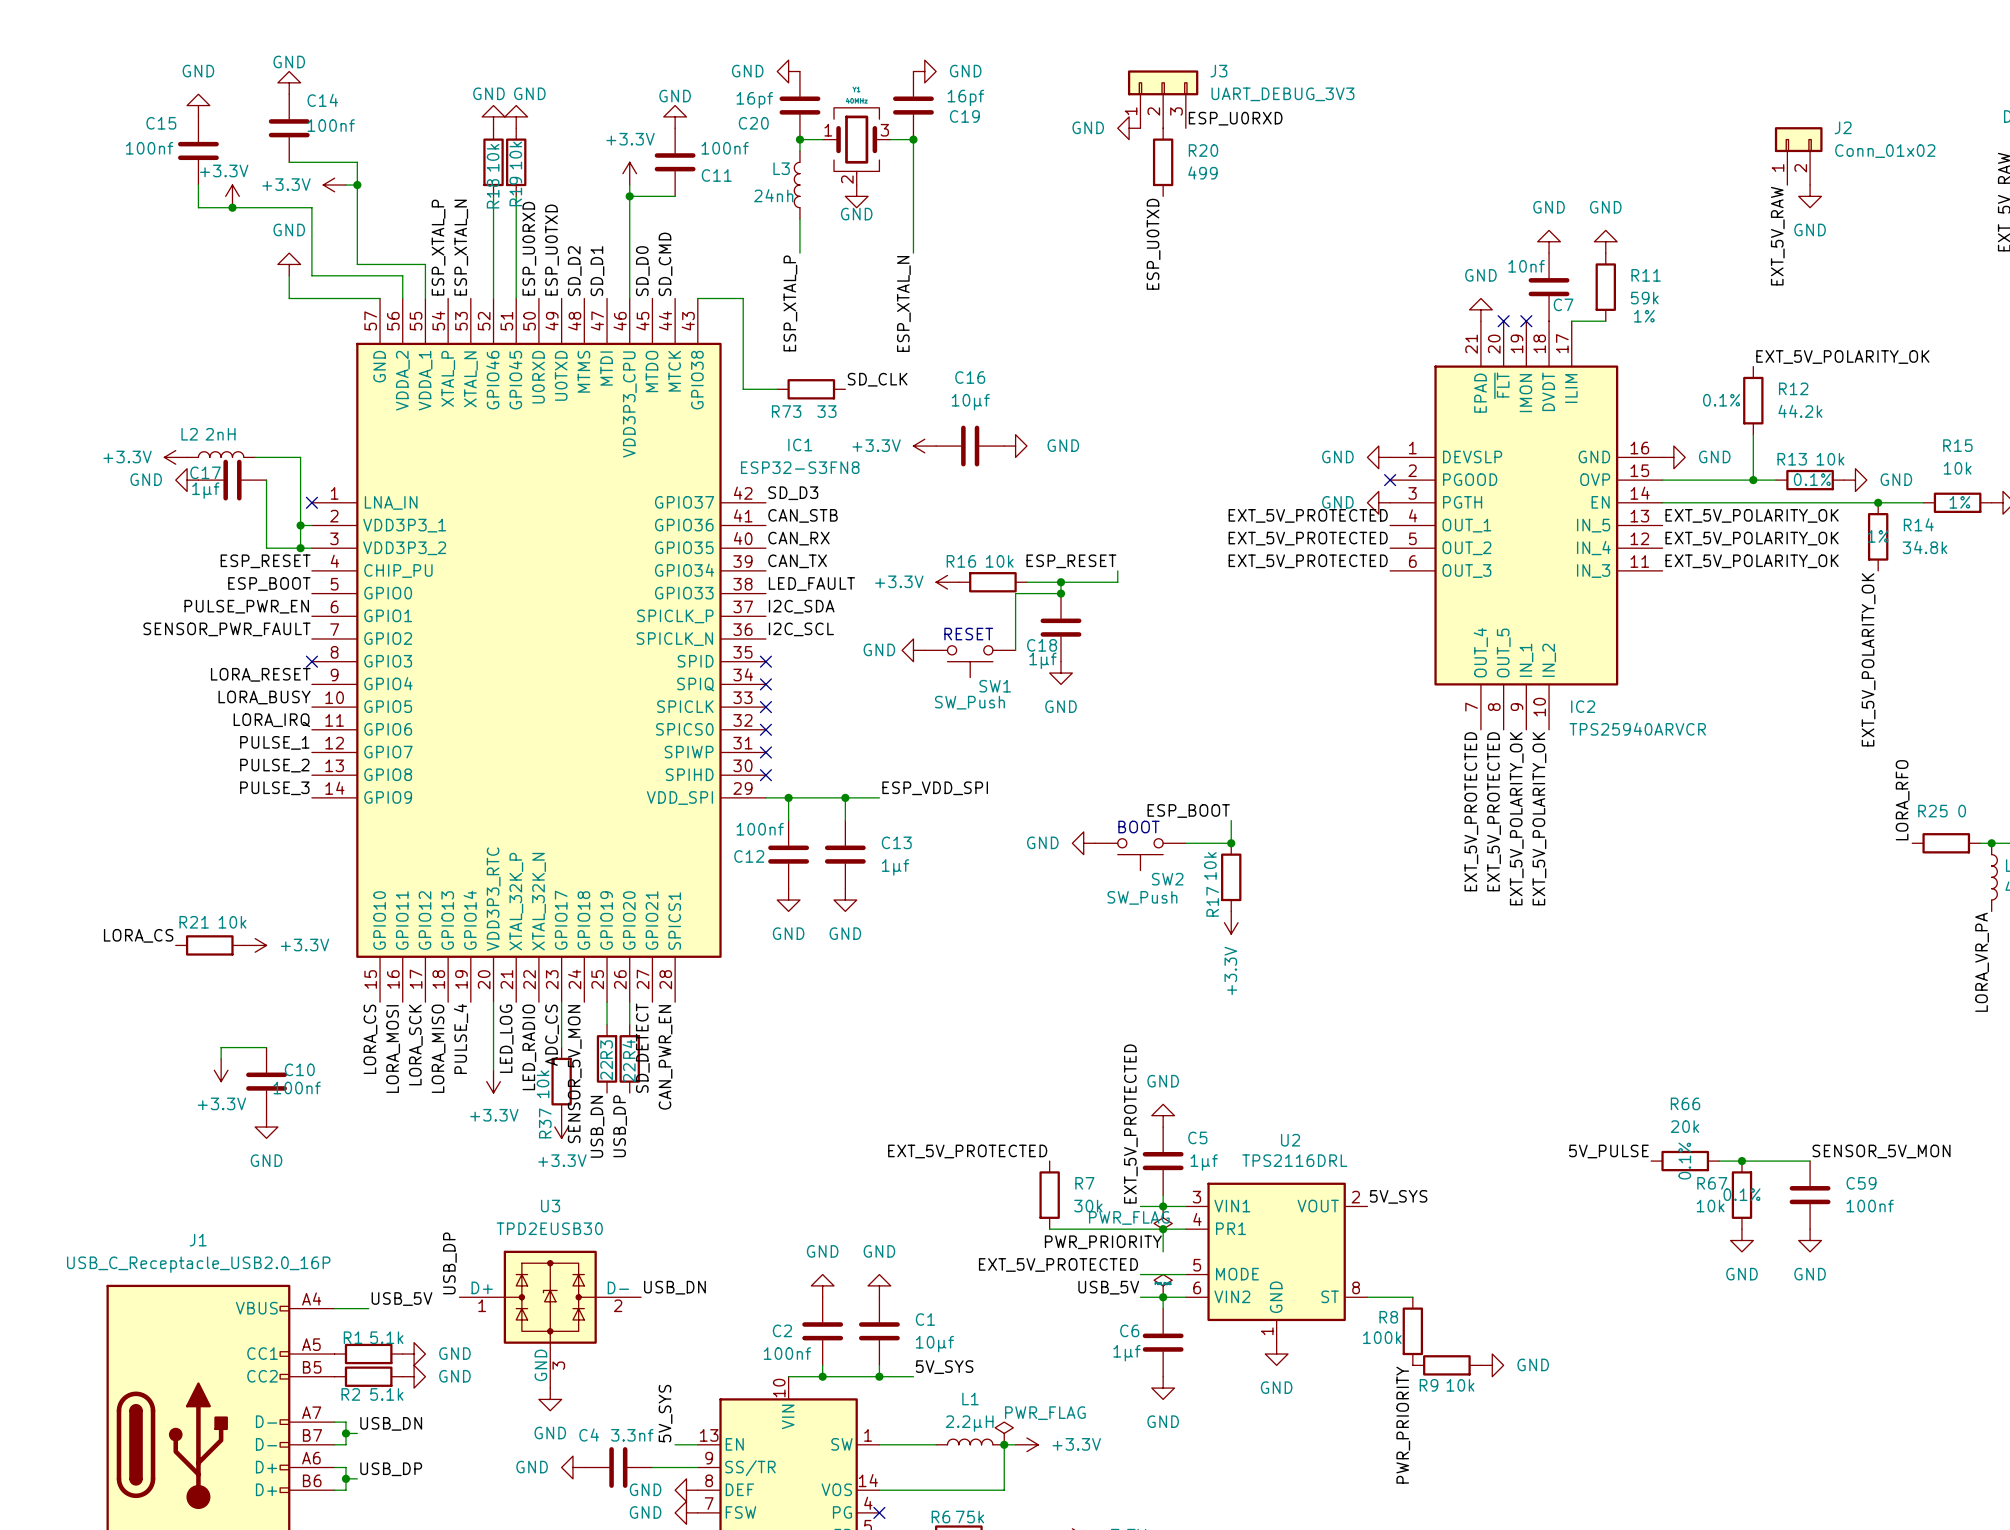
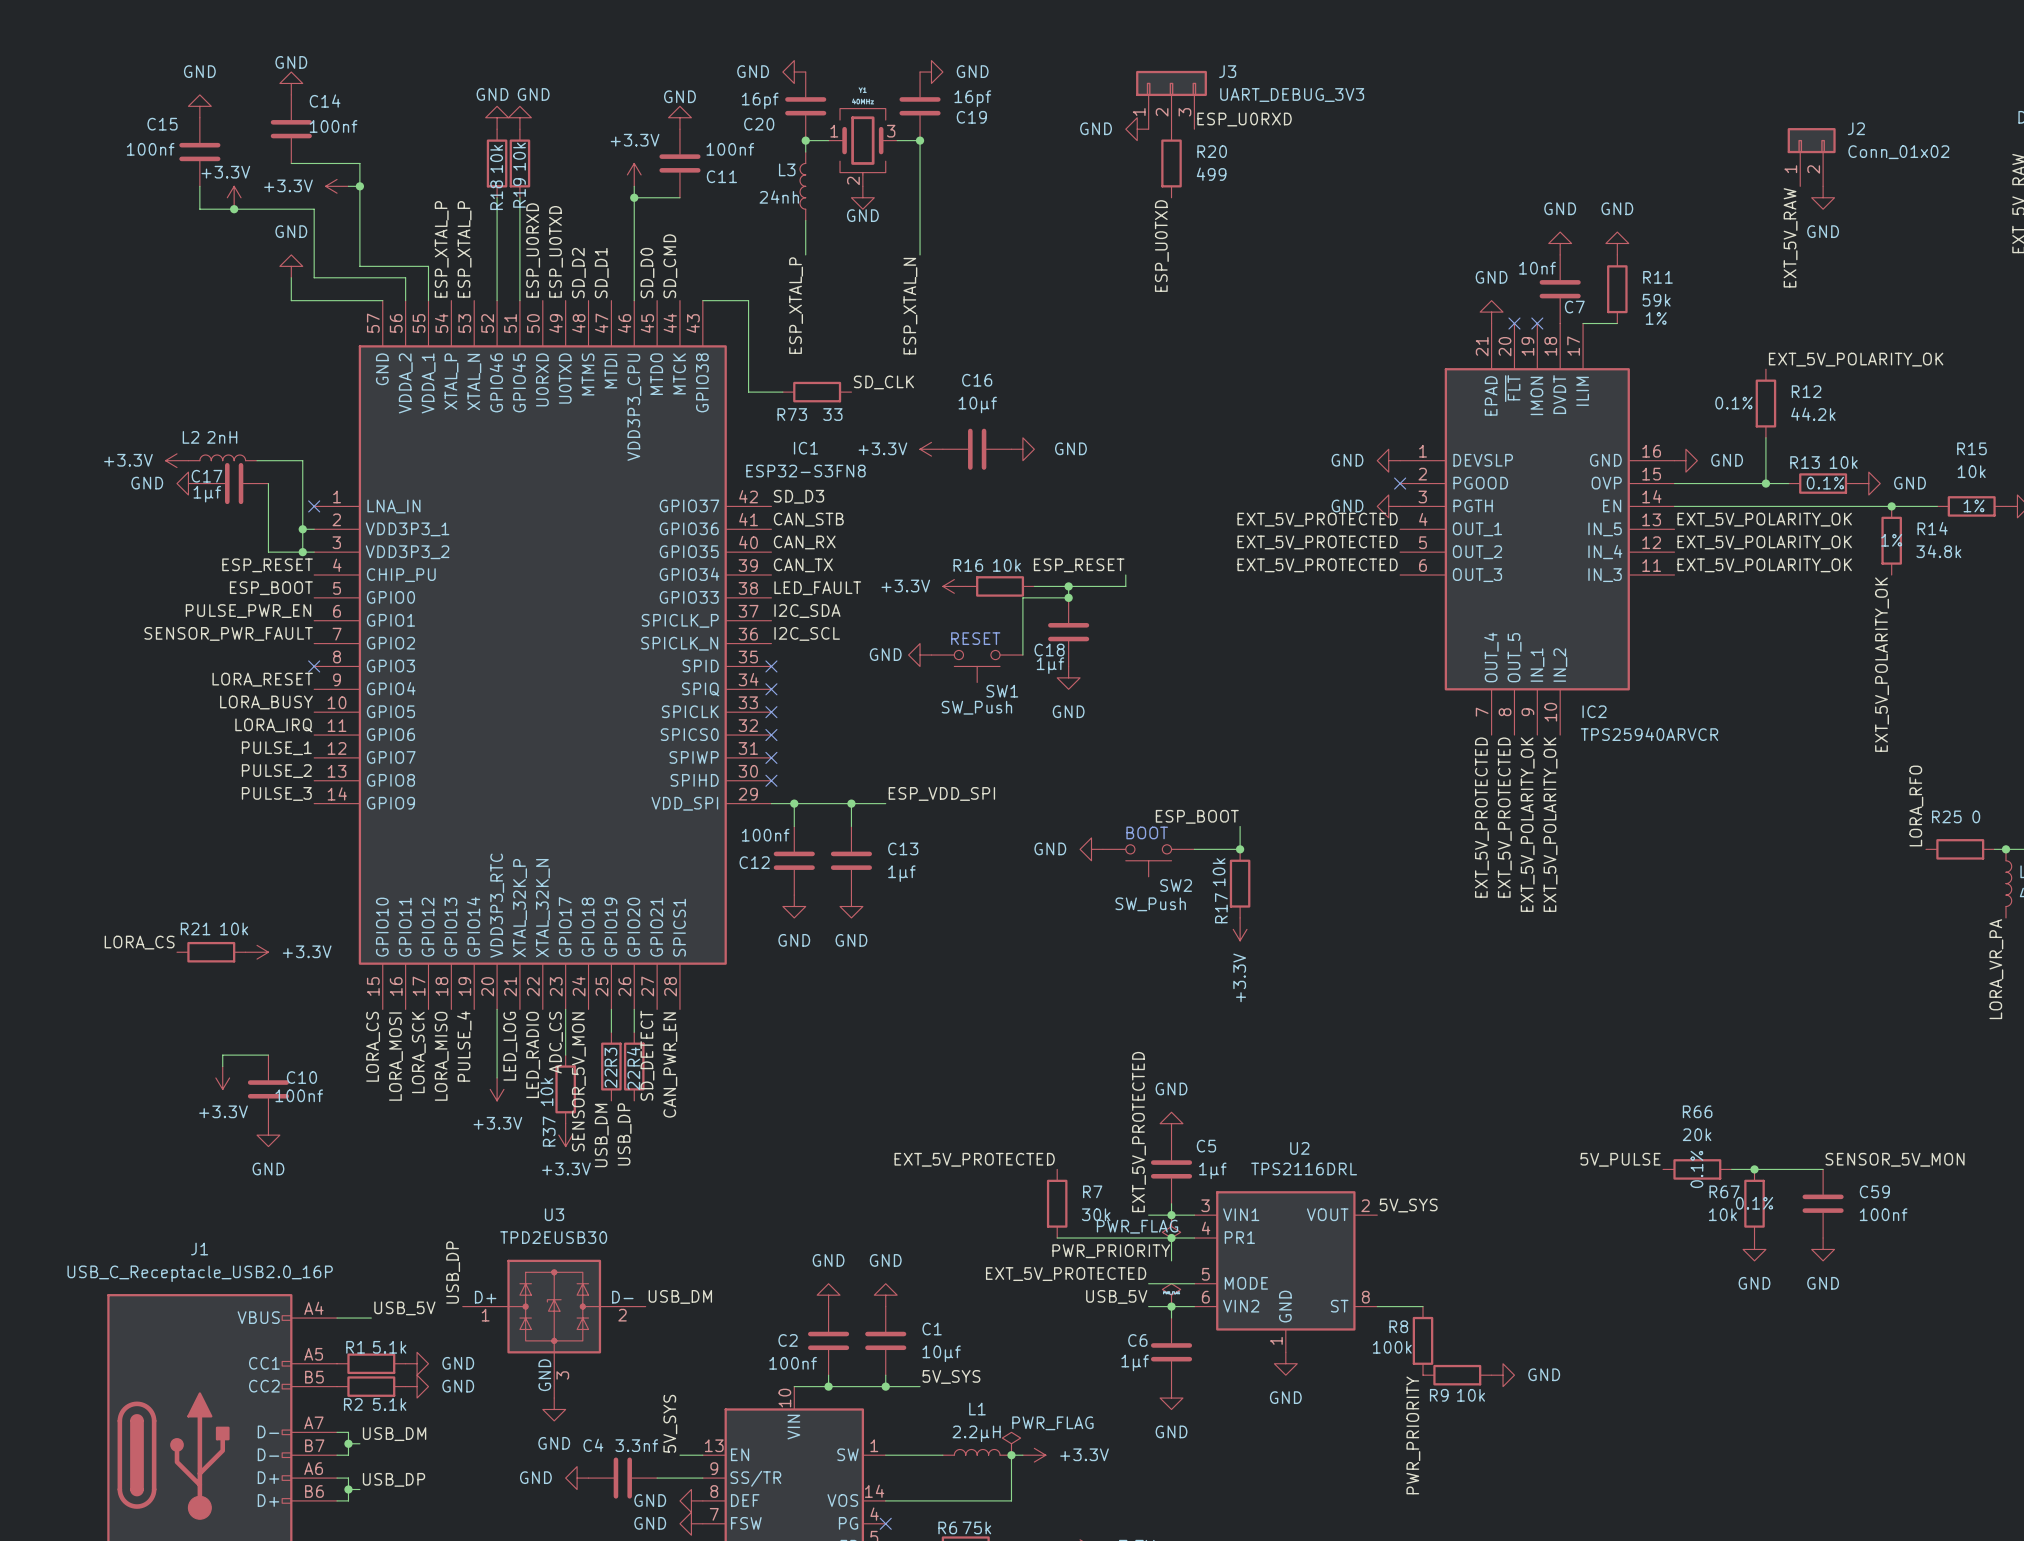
label: ESP_XTAL_N (461, 247) -> ESP_XTAL_P (464, 249)
label: USB_DN (597, 1126) -> USB_DM (601, 1135)
label: USB_DN (674, 1287) -> USB_DM (680, 1296)
label: USB_DN (391, 1423) -> USB_DM (394, 1434)

